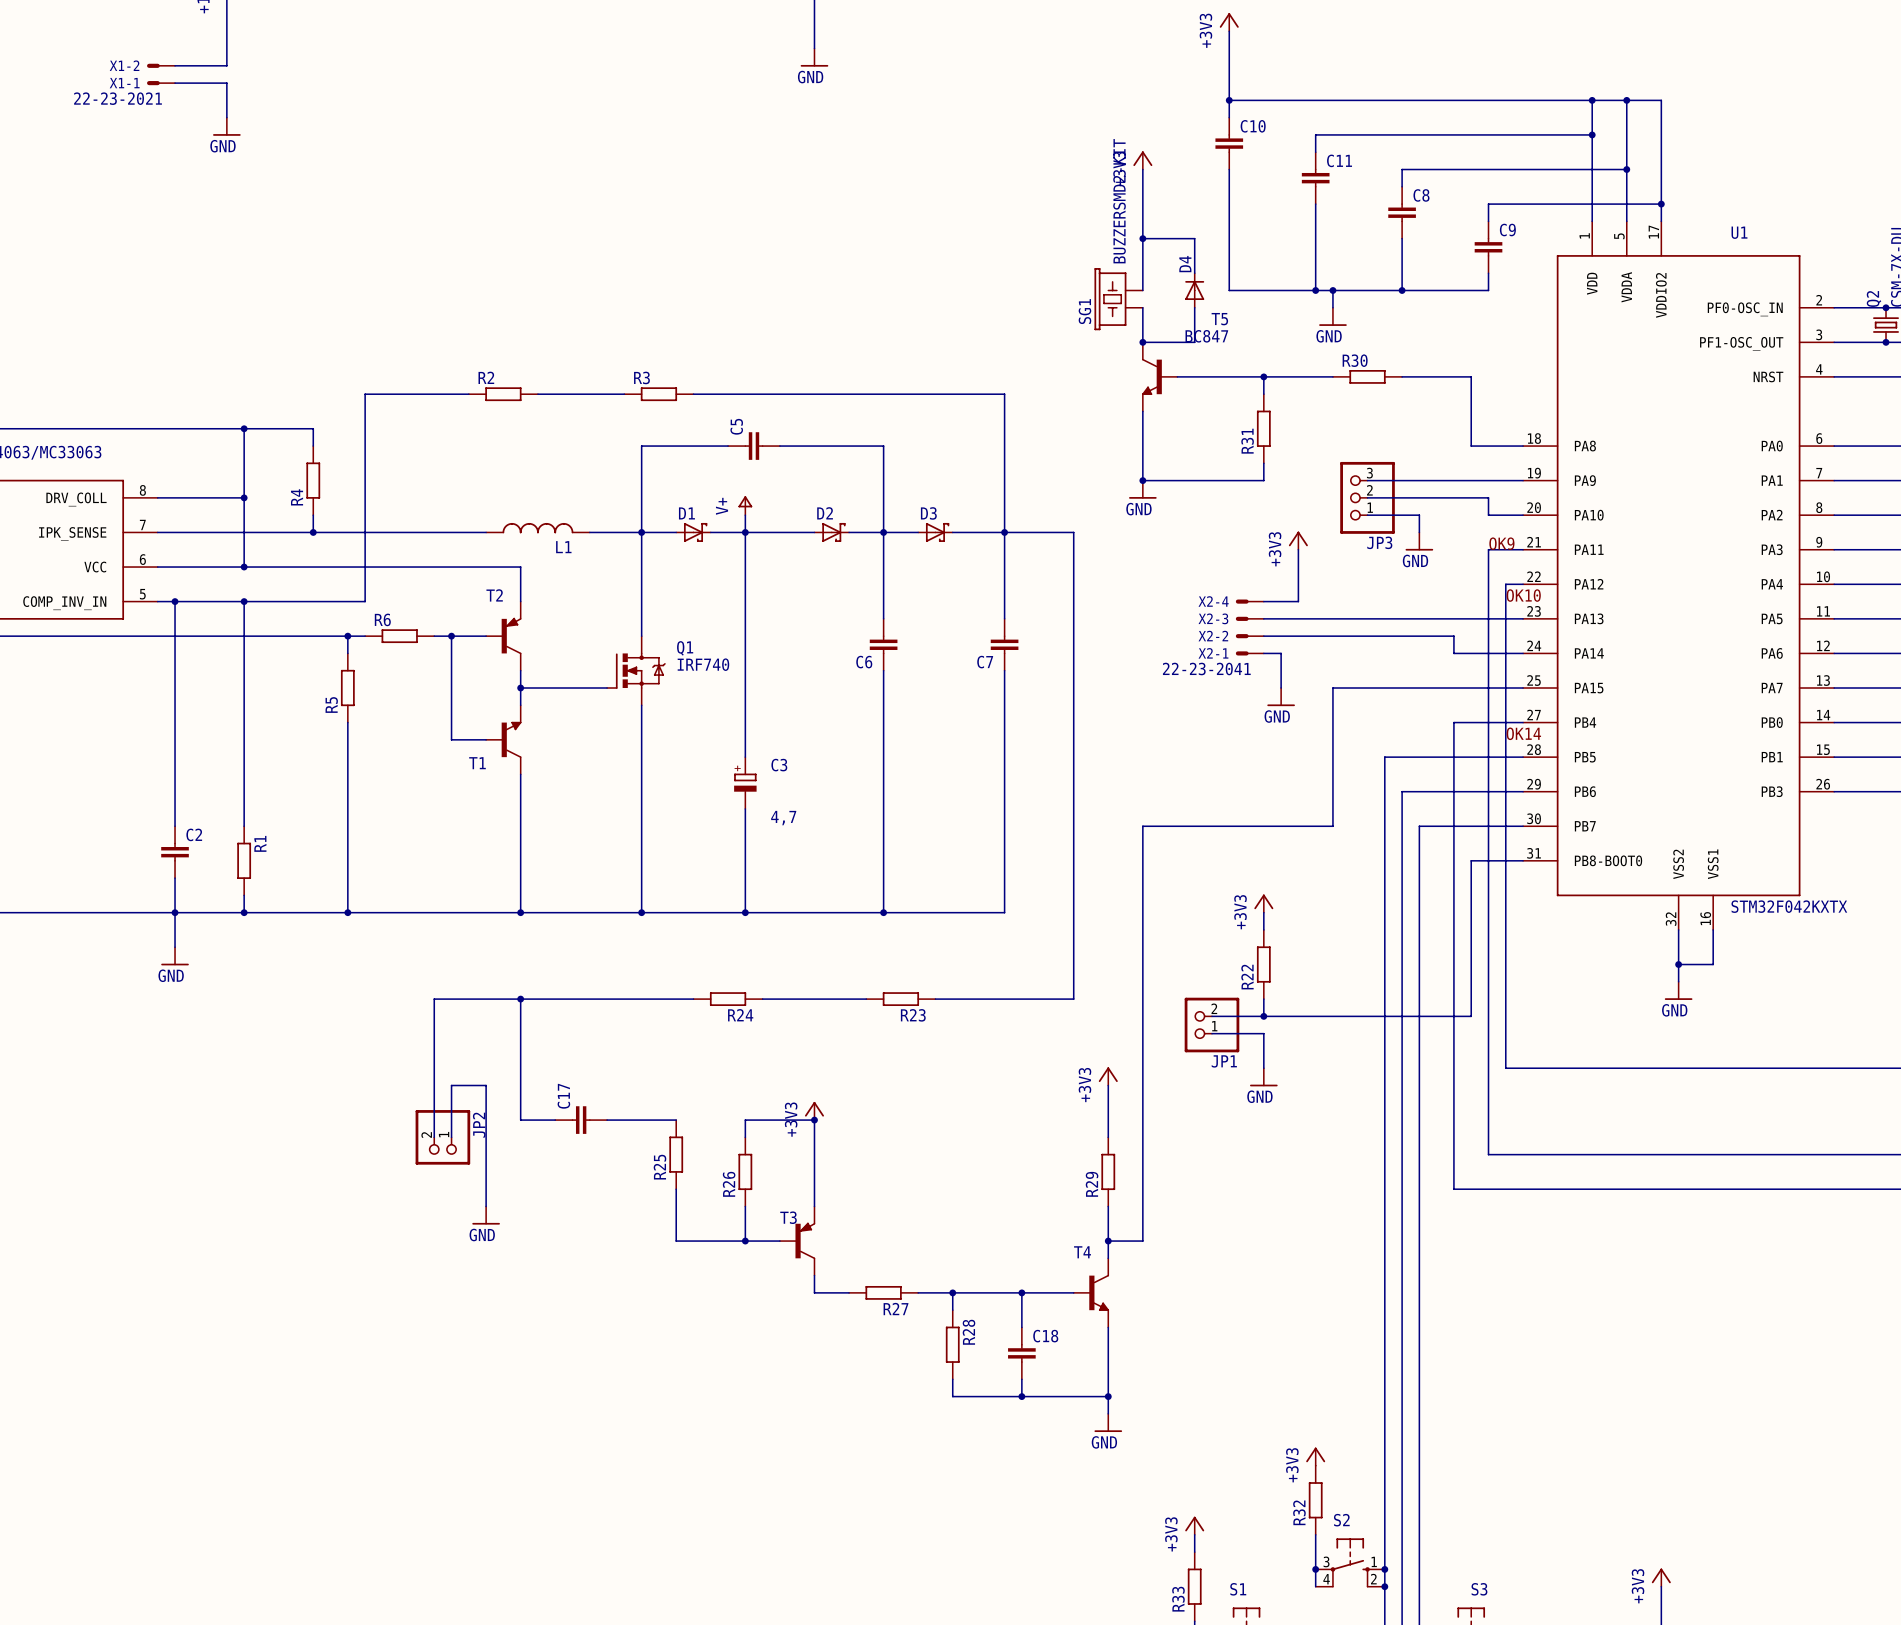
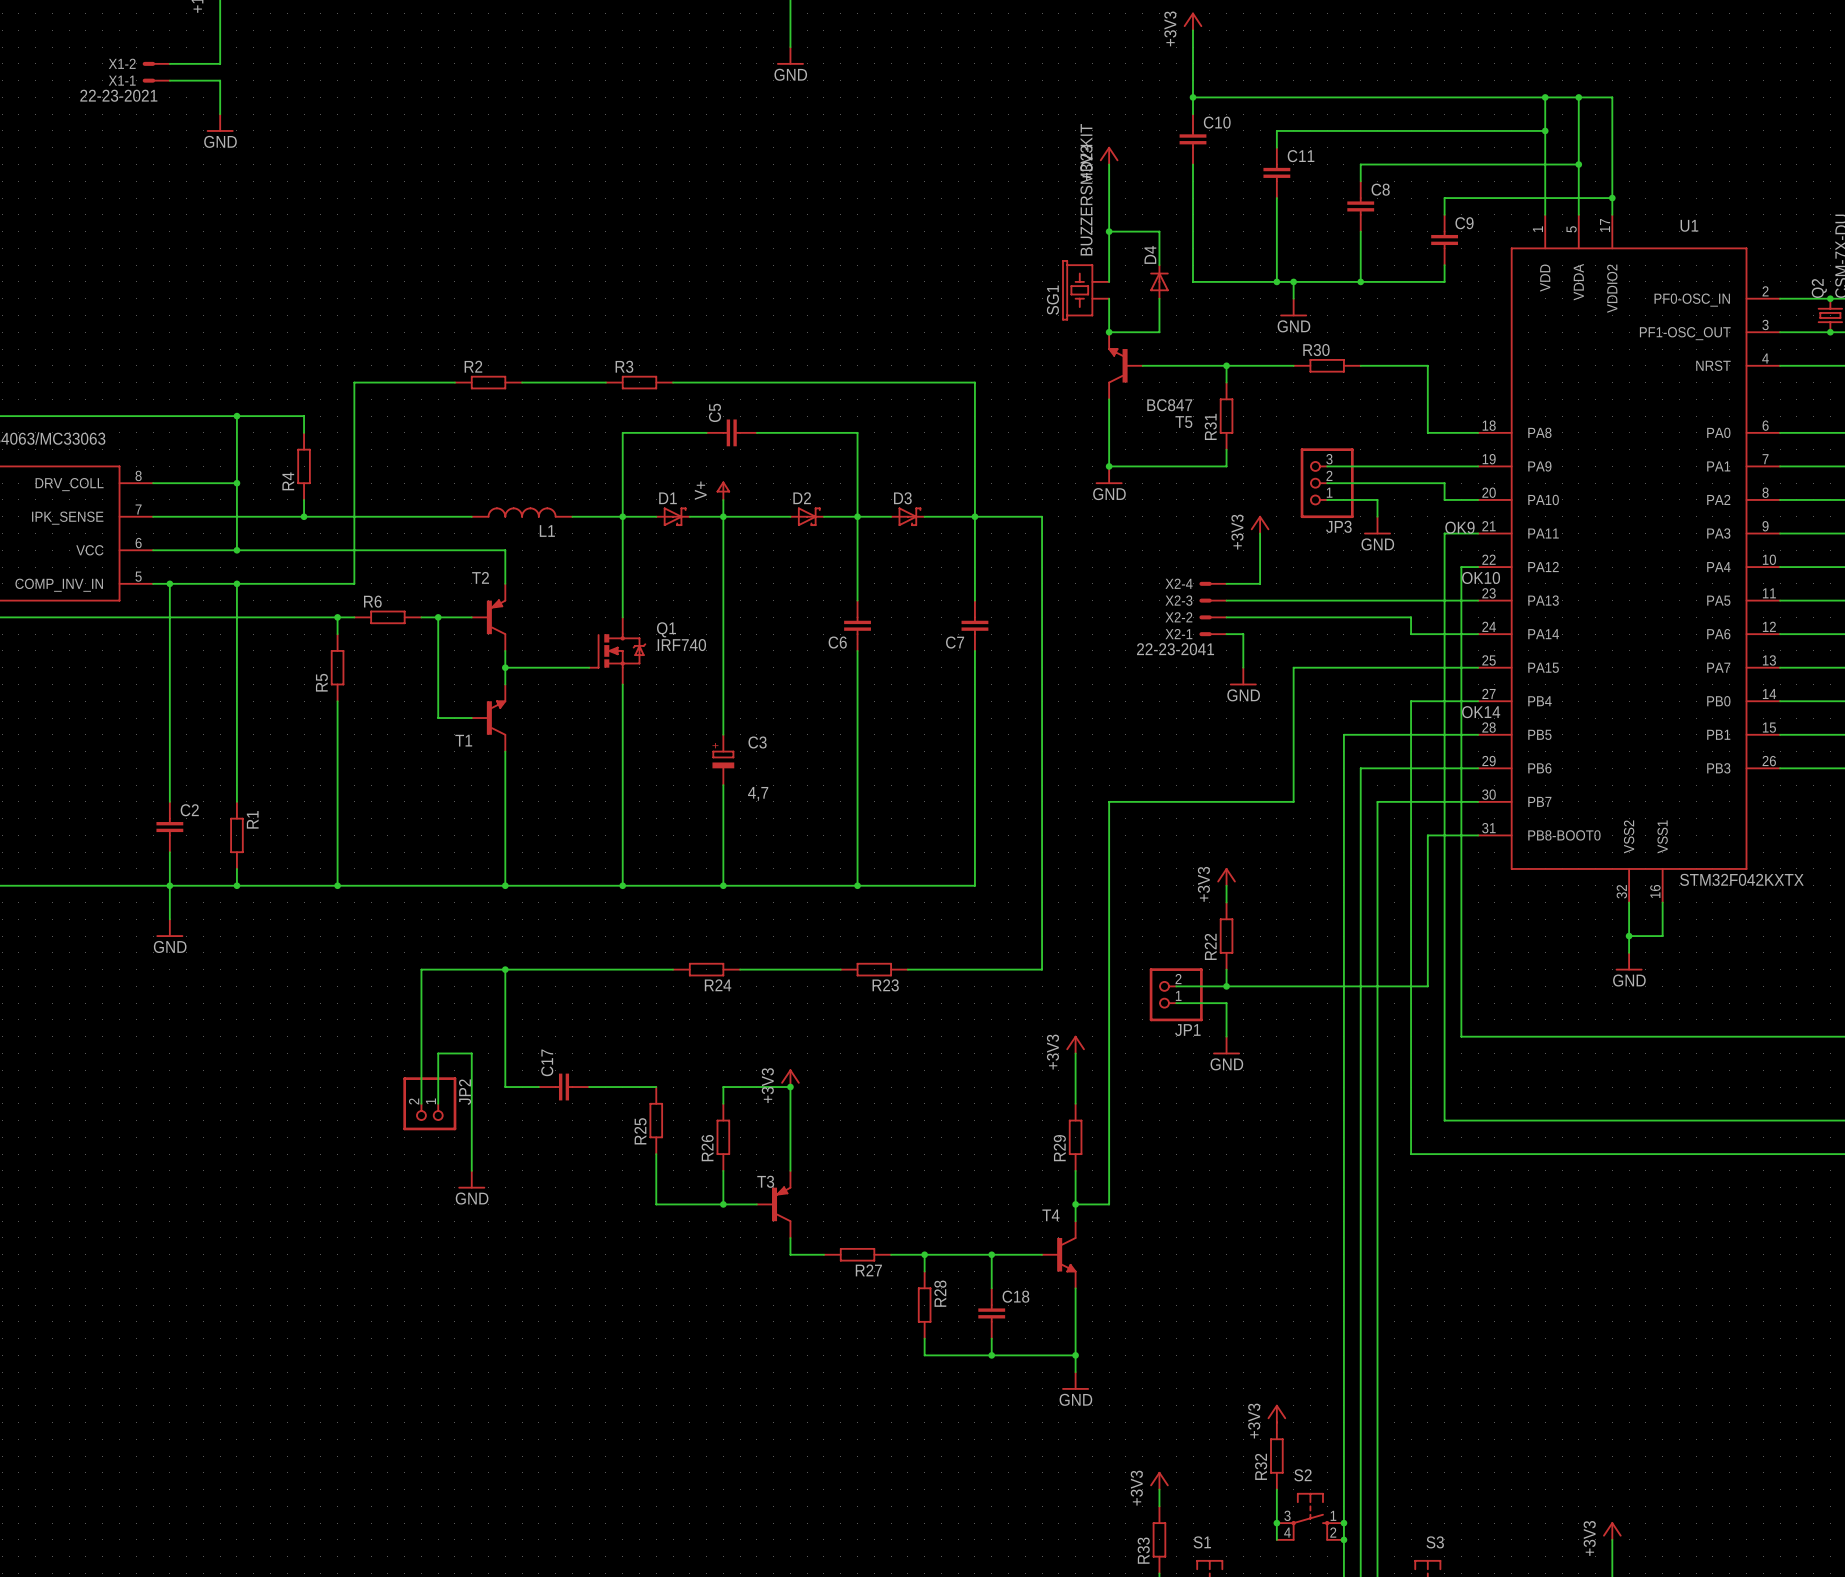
T5 flip: as is (1152, 376) -> up-down (1118, 365)

